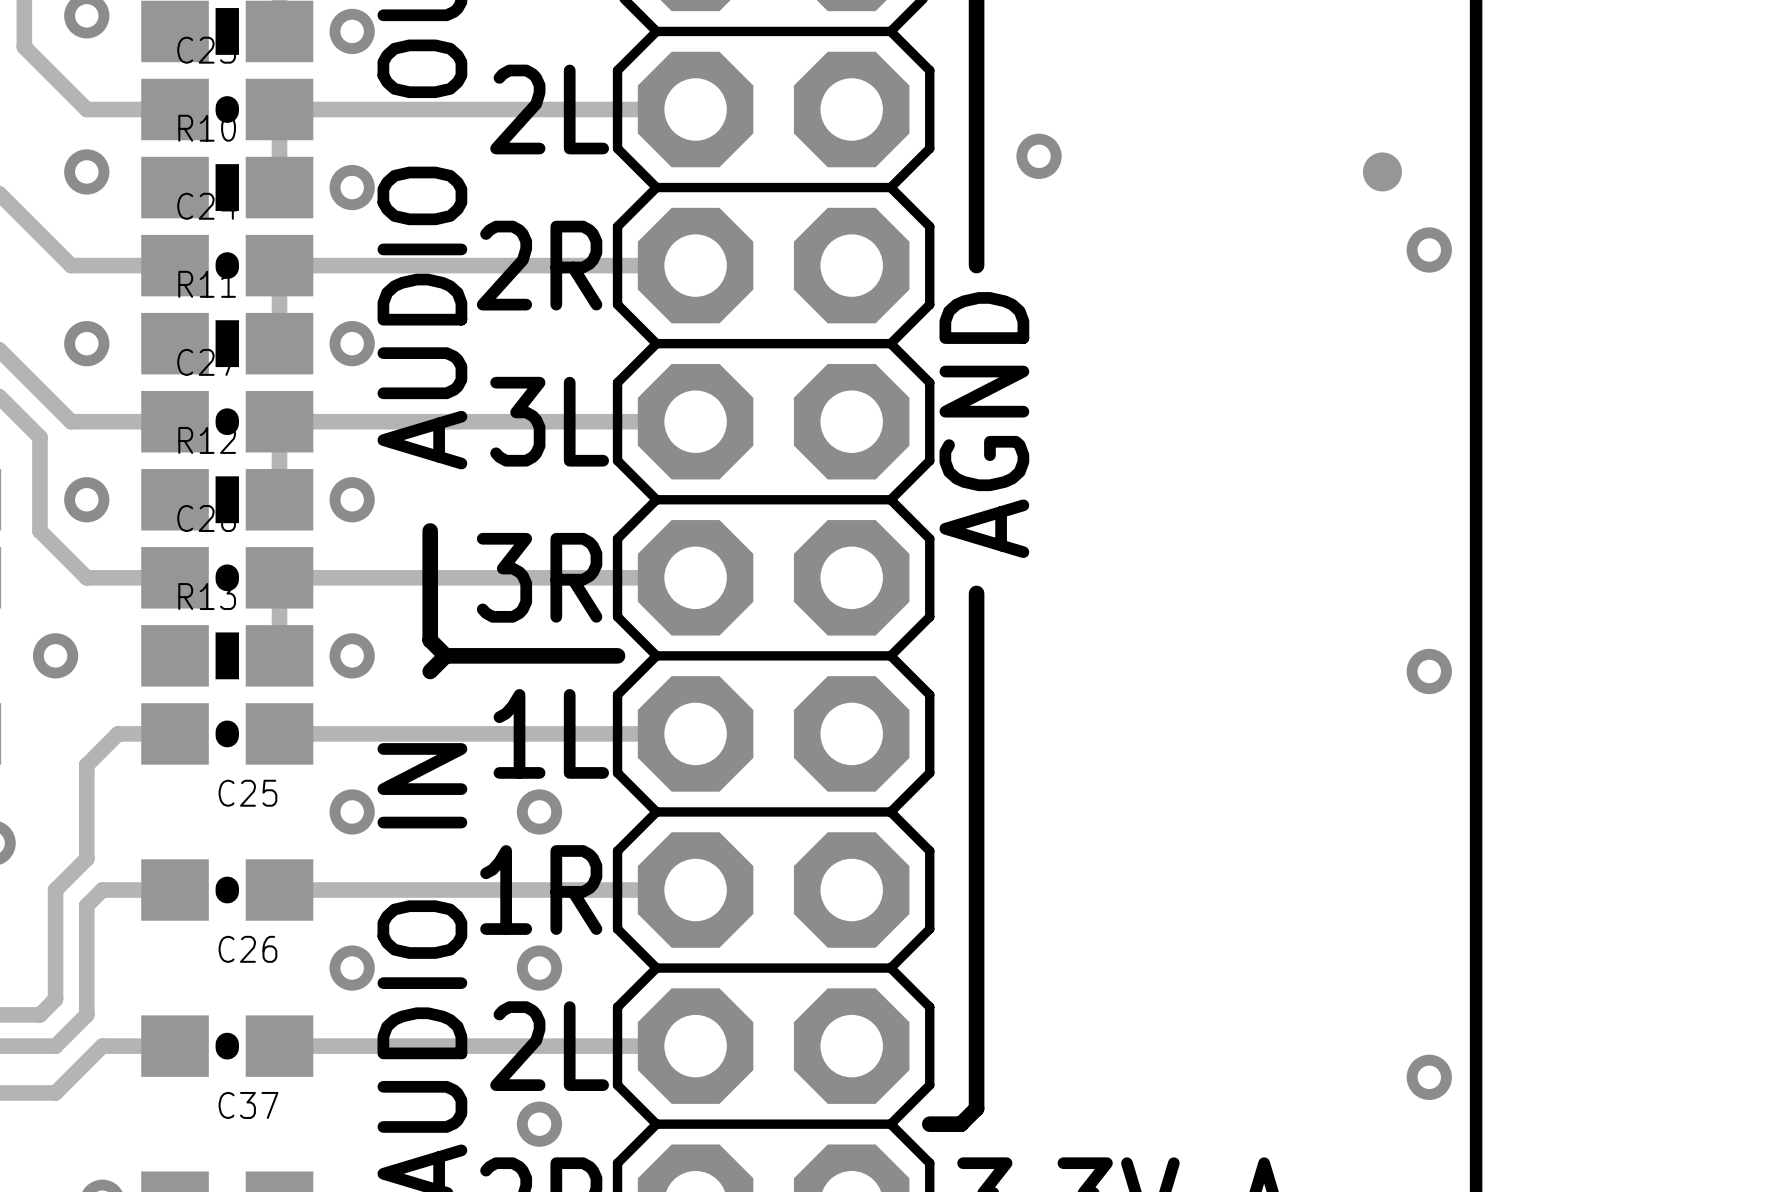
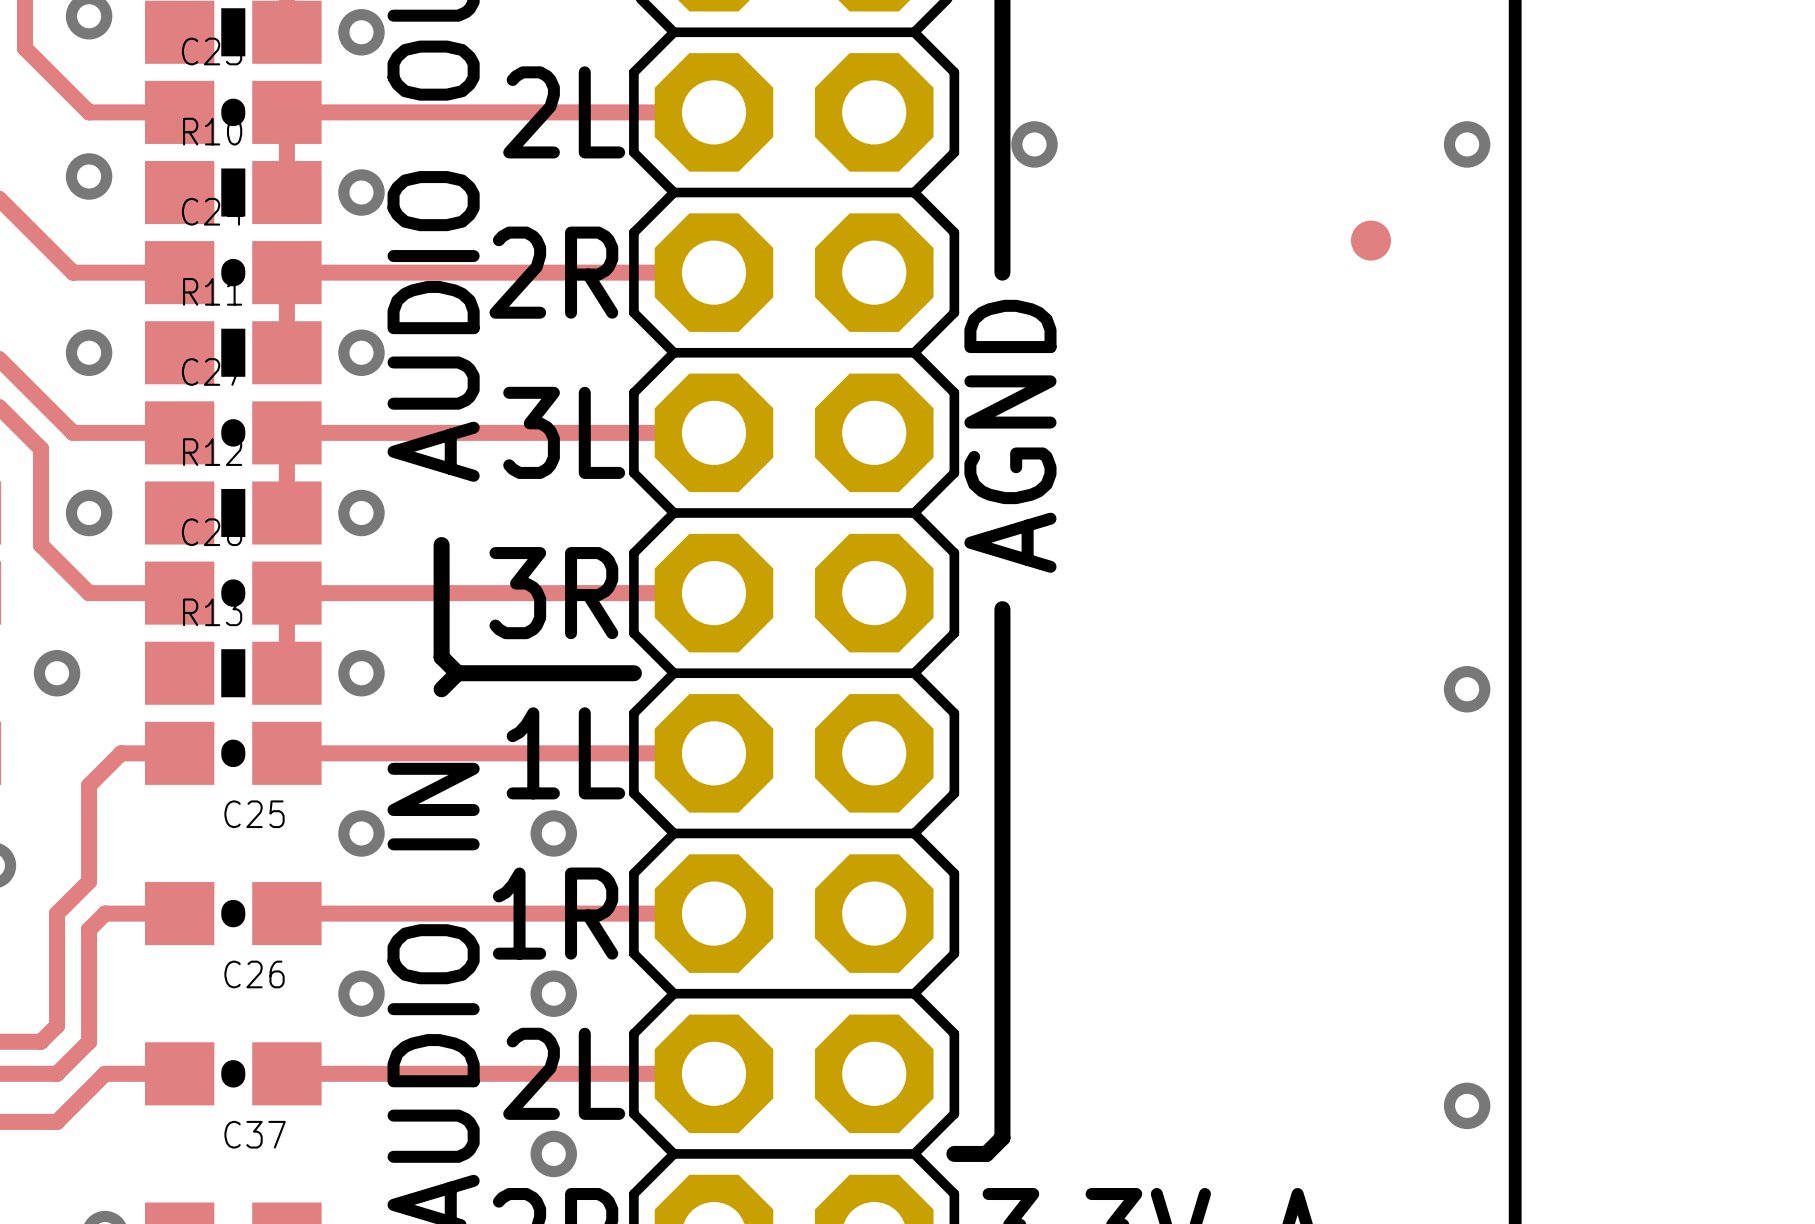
via position: (1039, 156) -> (1034, 144)
part position: (1382, 171) -> (1370, 240)
via position: (1429, 249) -> (1467, 144)

